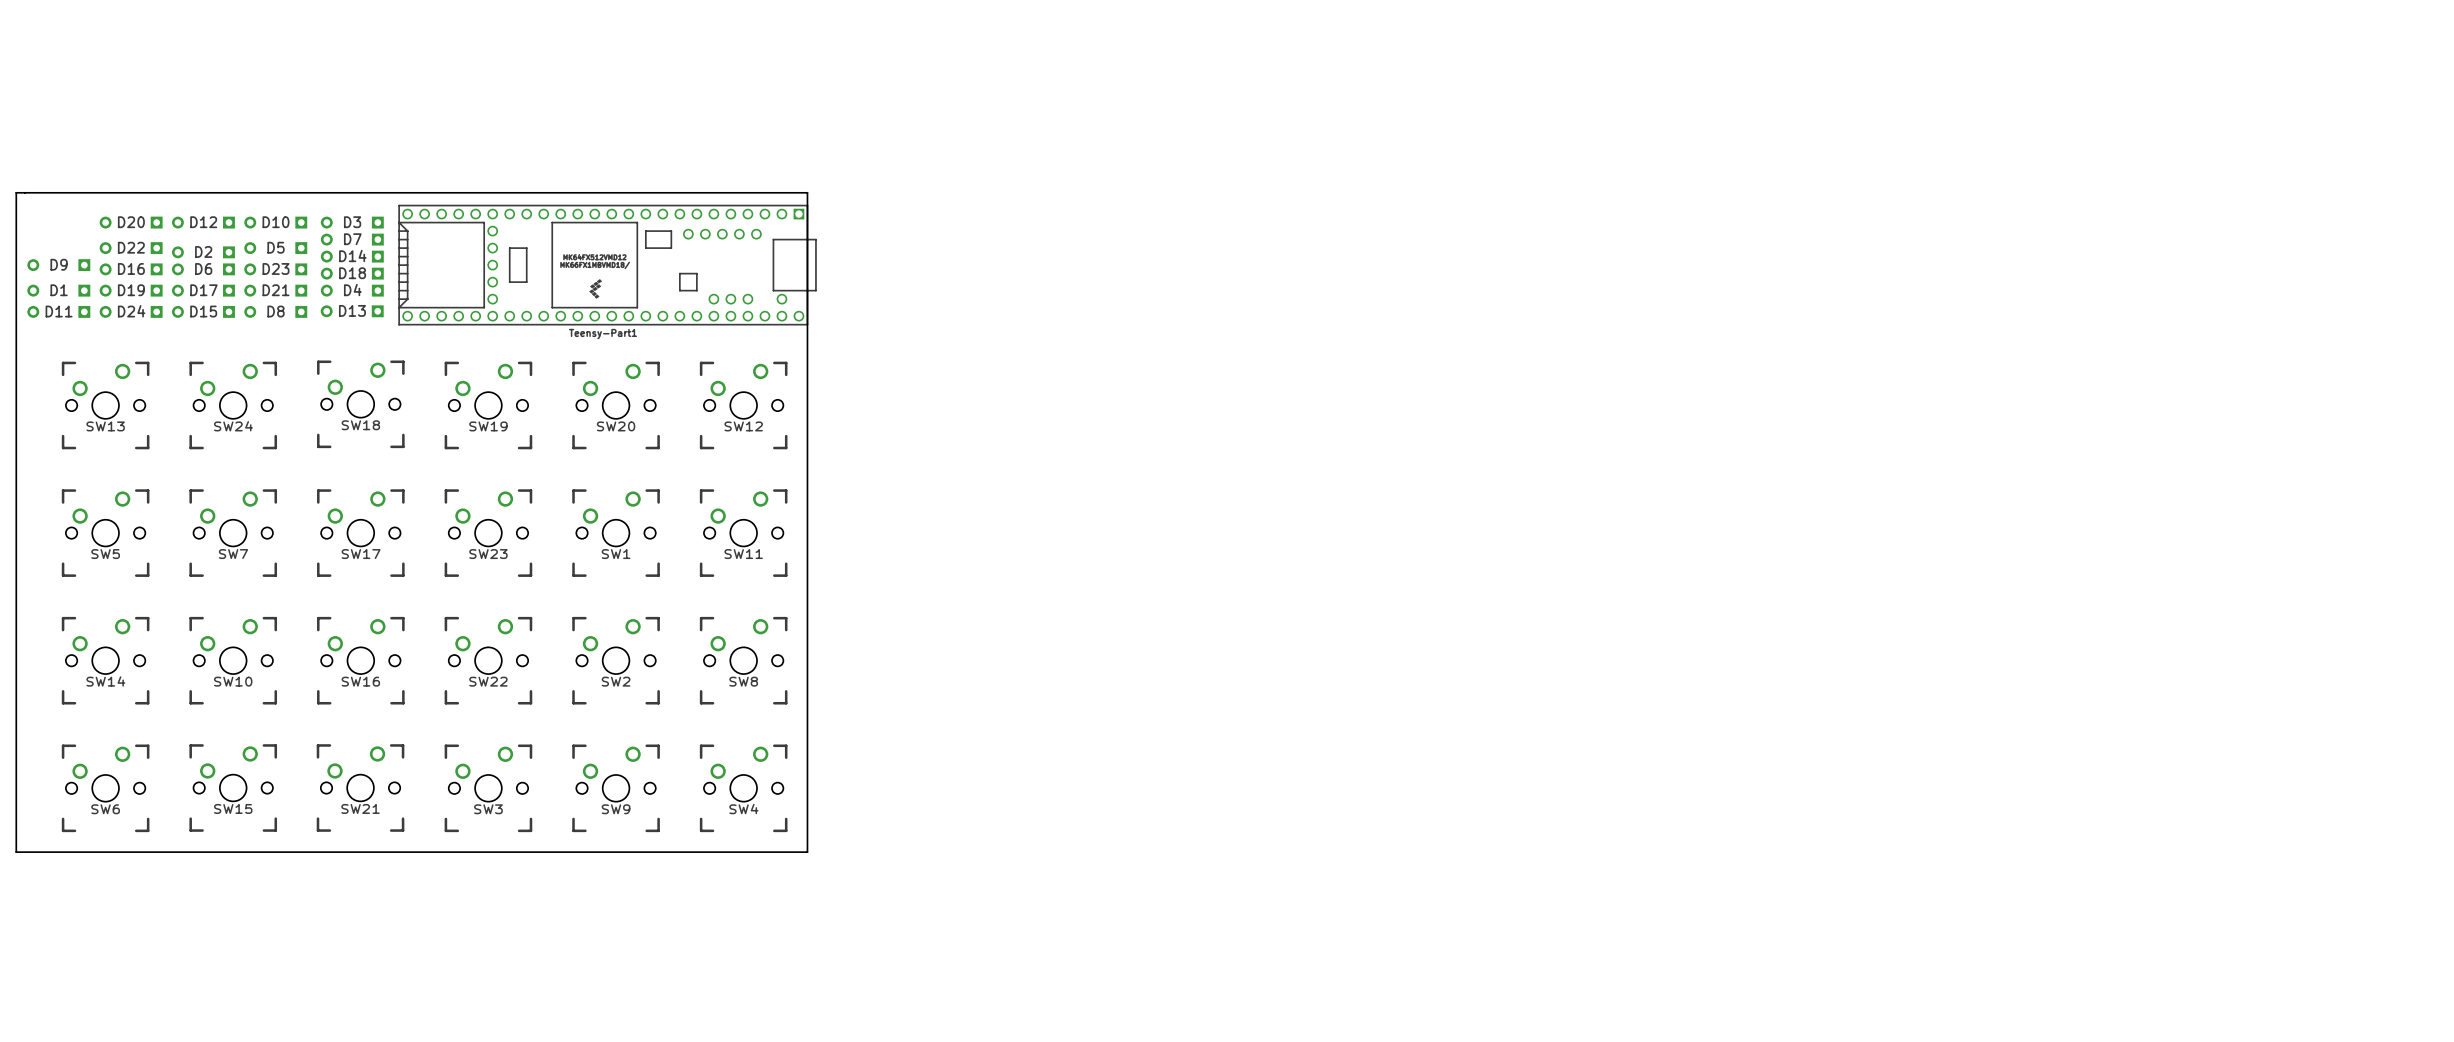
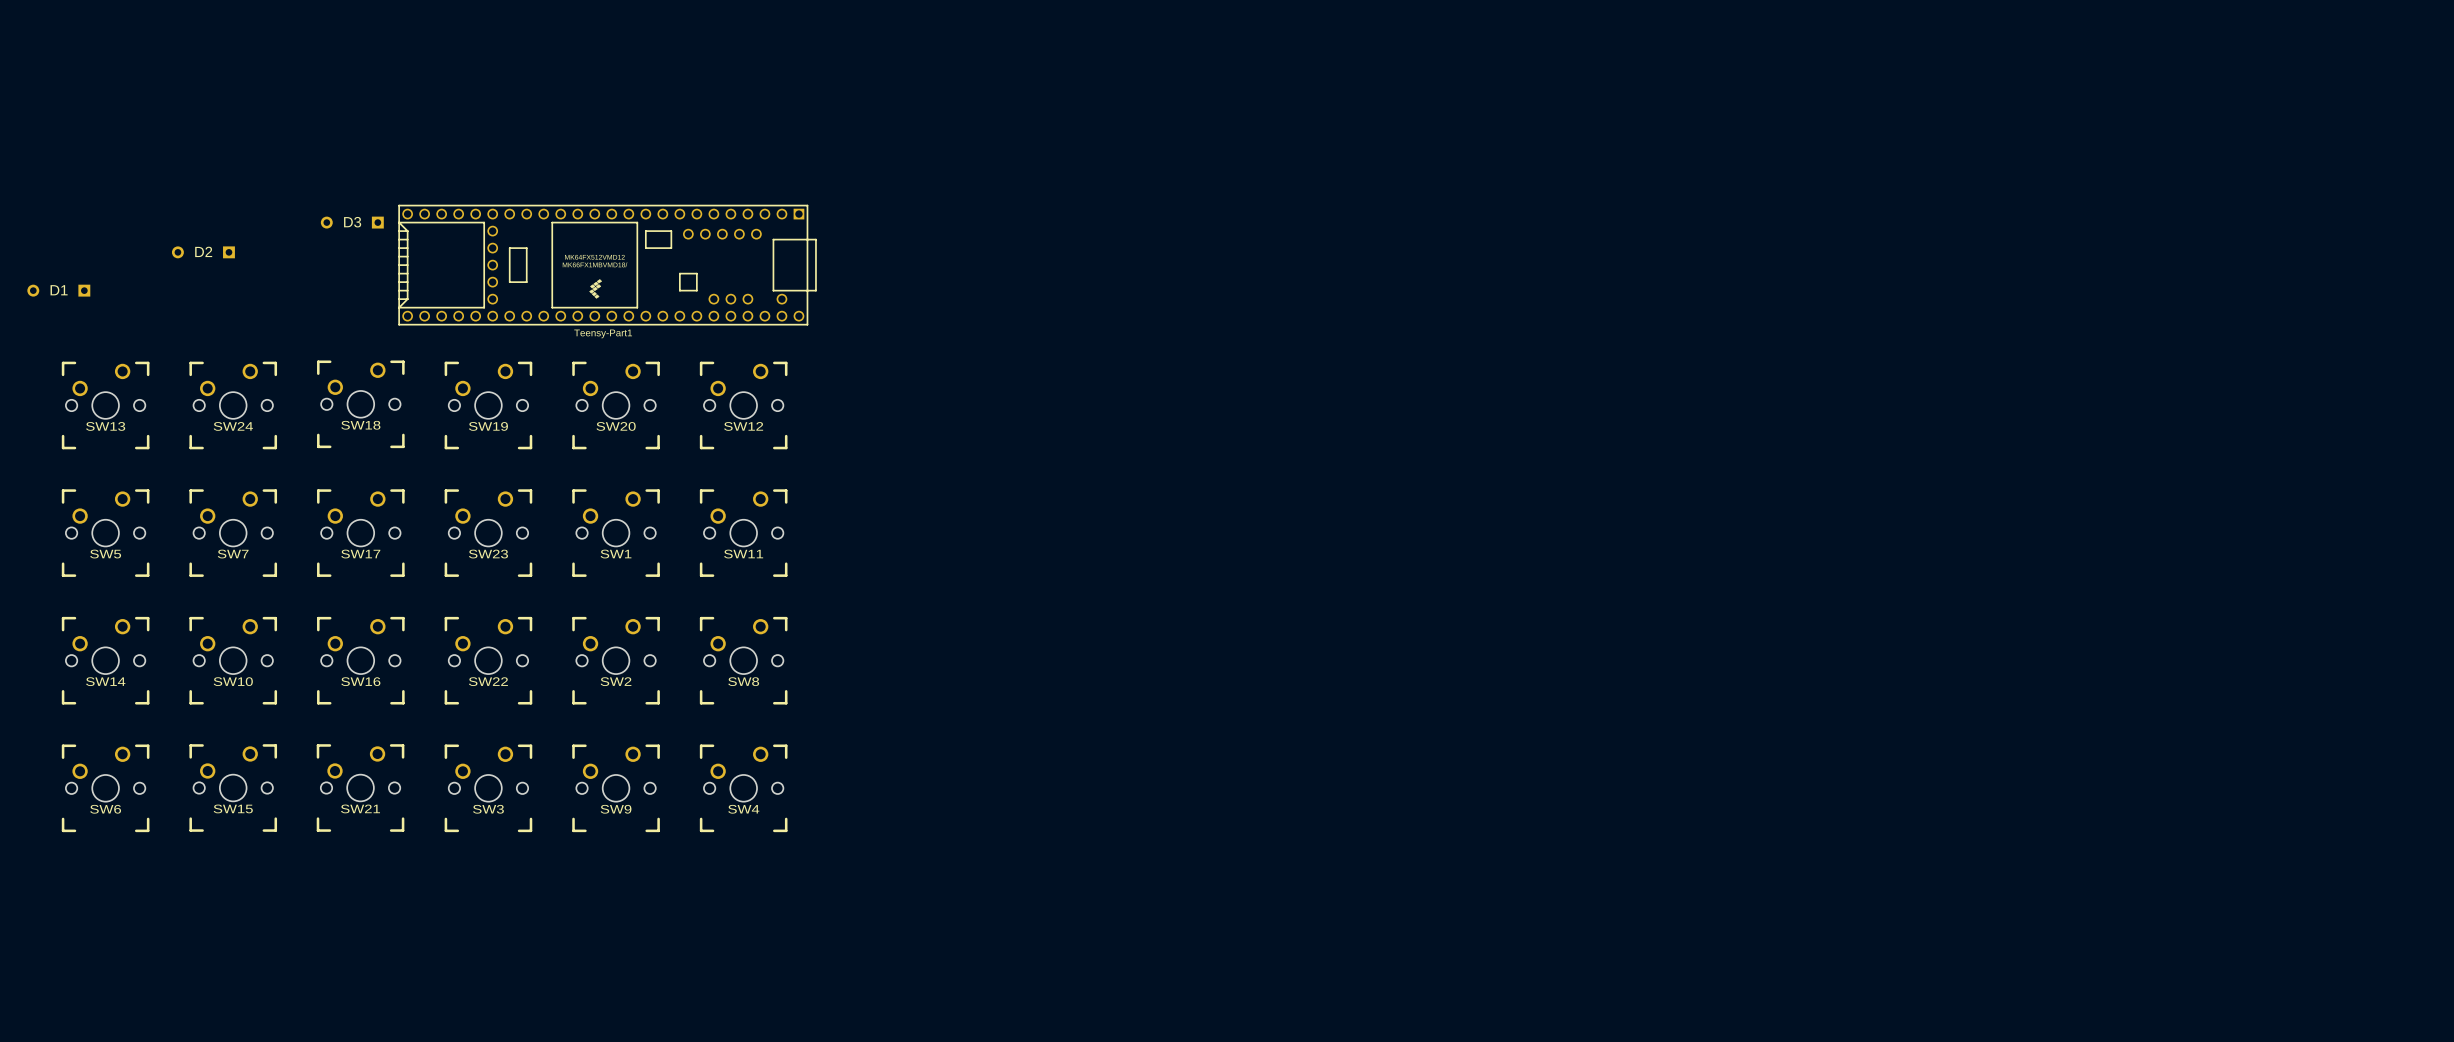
board edge: (16, 192) (16, 852) (807, 852) (807, 192) (16, 192) -> none
D20: (131, 222) -> none
D12: (203, 222) -> none
D10: (275, 222) -> none
D7: (352, 239) -> none
D22: (131, 248) -> none
D5: (275, 248) -> none
D14: (352, 256) -> none
D9: (58, 265) -> none
D16: (131, 269) -> none
D6: (203, 269) -> none
D23: (275, 269) -> none
D18: (352, 273) -> none
D19: (131, 290) -> none
D17: (203, 290) -> none
D21: (275, 290) -> none
D4: (352, 290) -> none
D11: (58, 311) -> none
D24: (131, 311) -> none
D15: (203, 311) -> none
D8: (275, 311) -> none
D13: (352, 311) -> none

